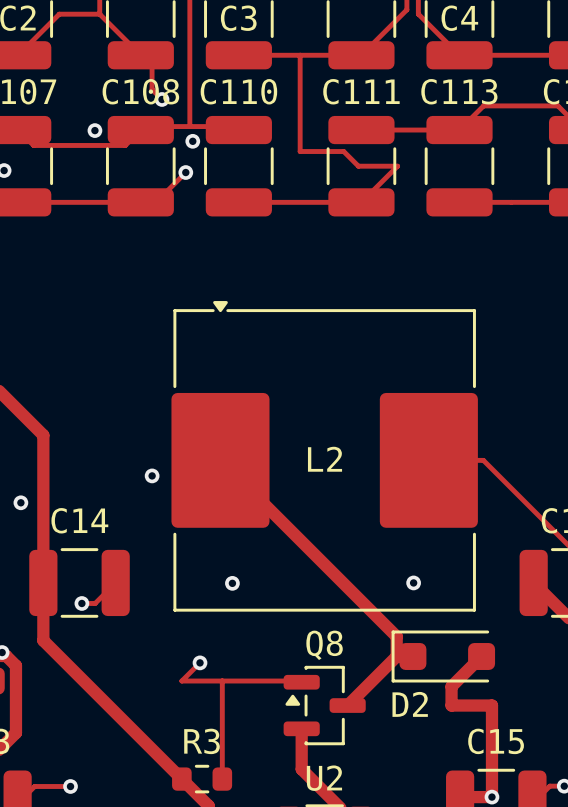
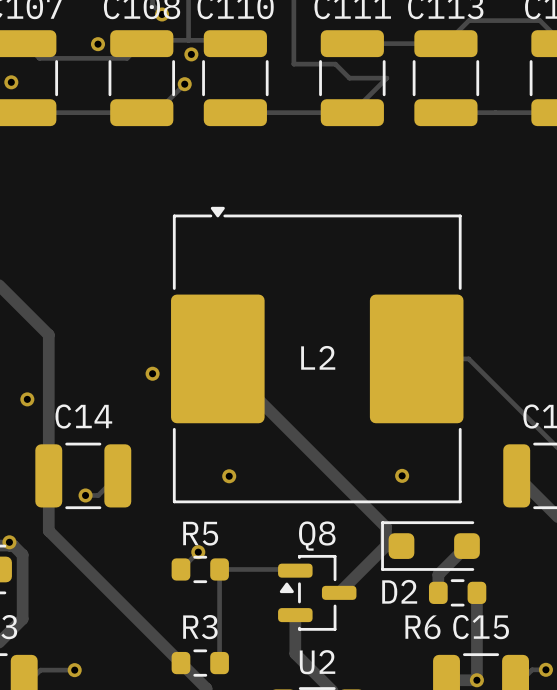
track: (181, 681) (222, 681) -> none
R5: none -> (200, 569)
track: (451, 705) (491, 705) -> none
R6: none -> (457, 592)

